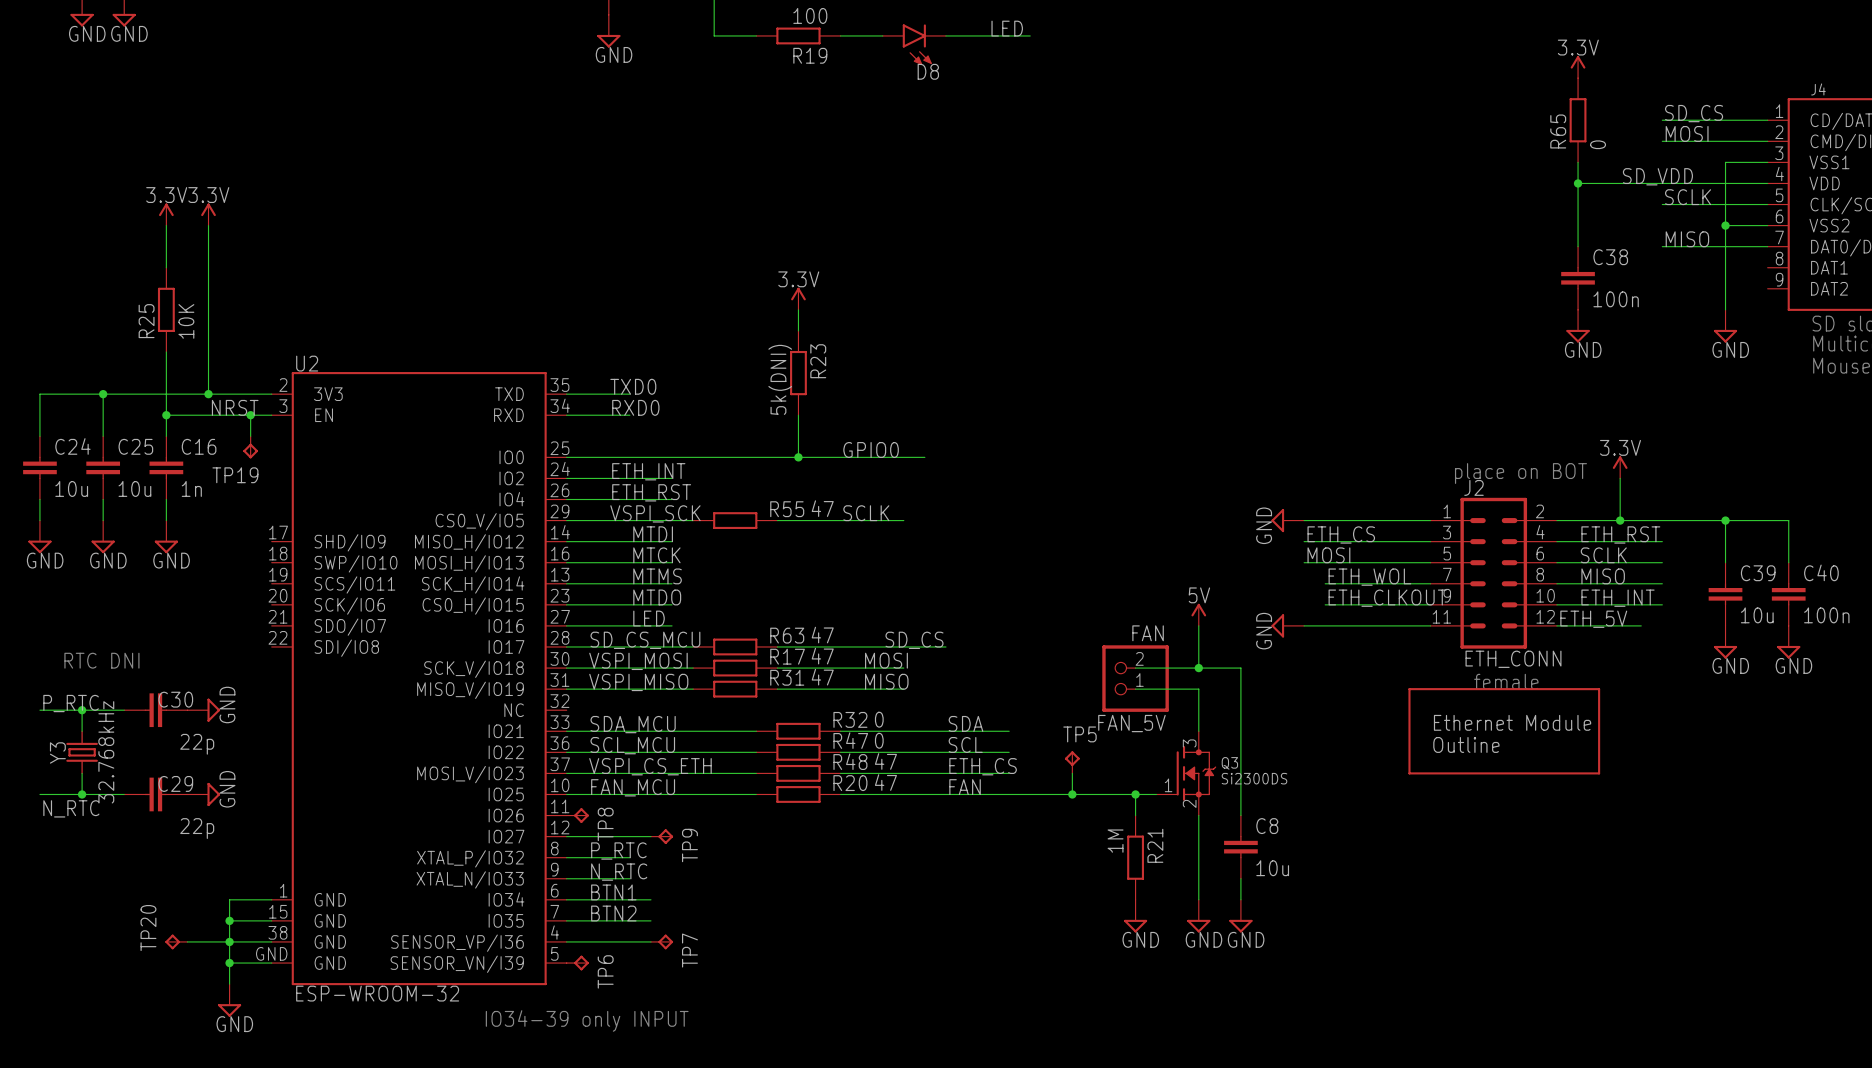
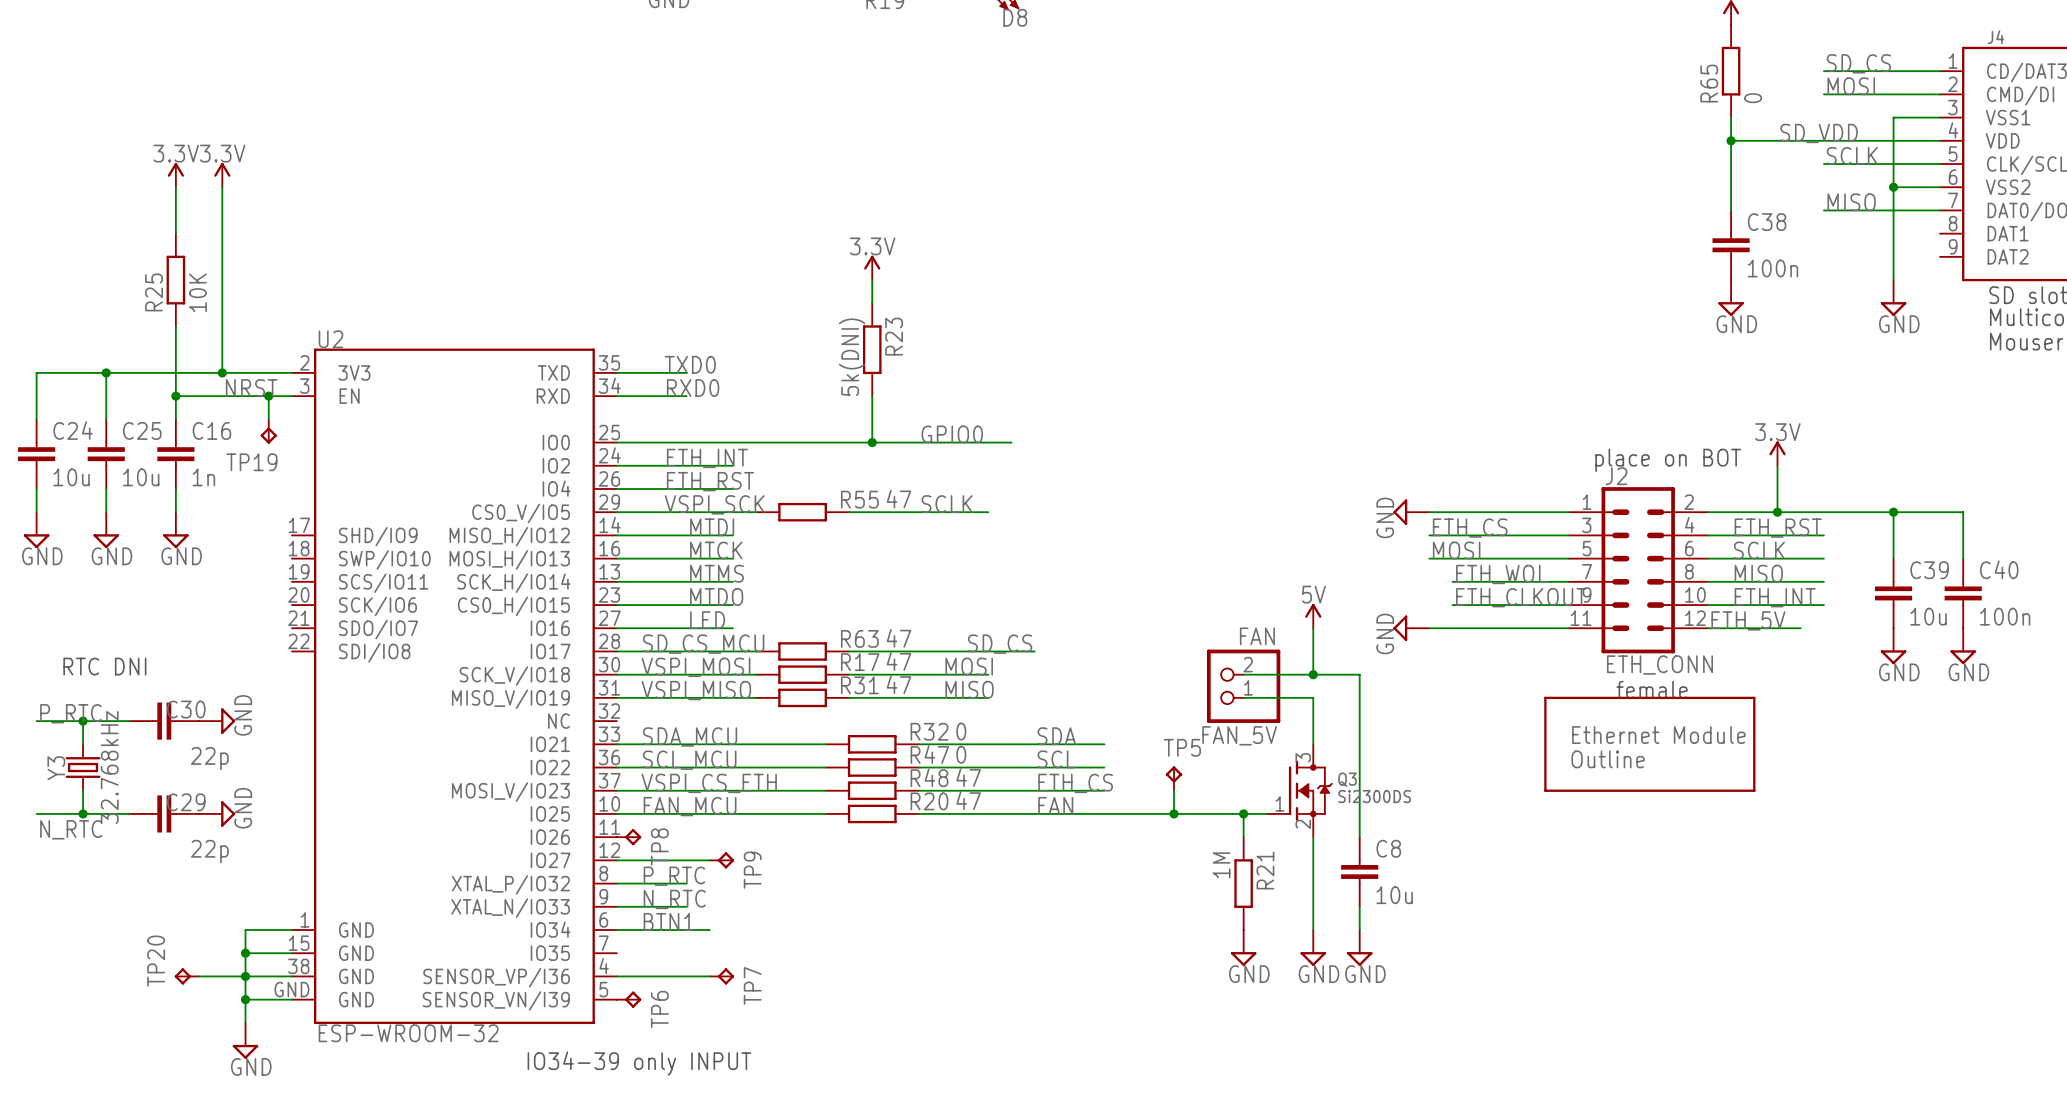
label: BTN2 (613, 913) -> none
wire: (566, 920) (650, 920) -> none

